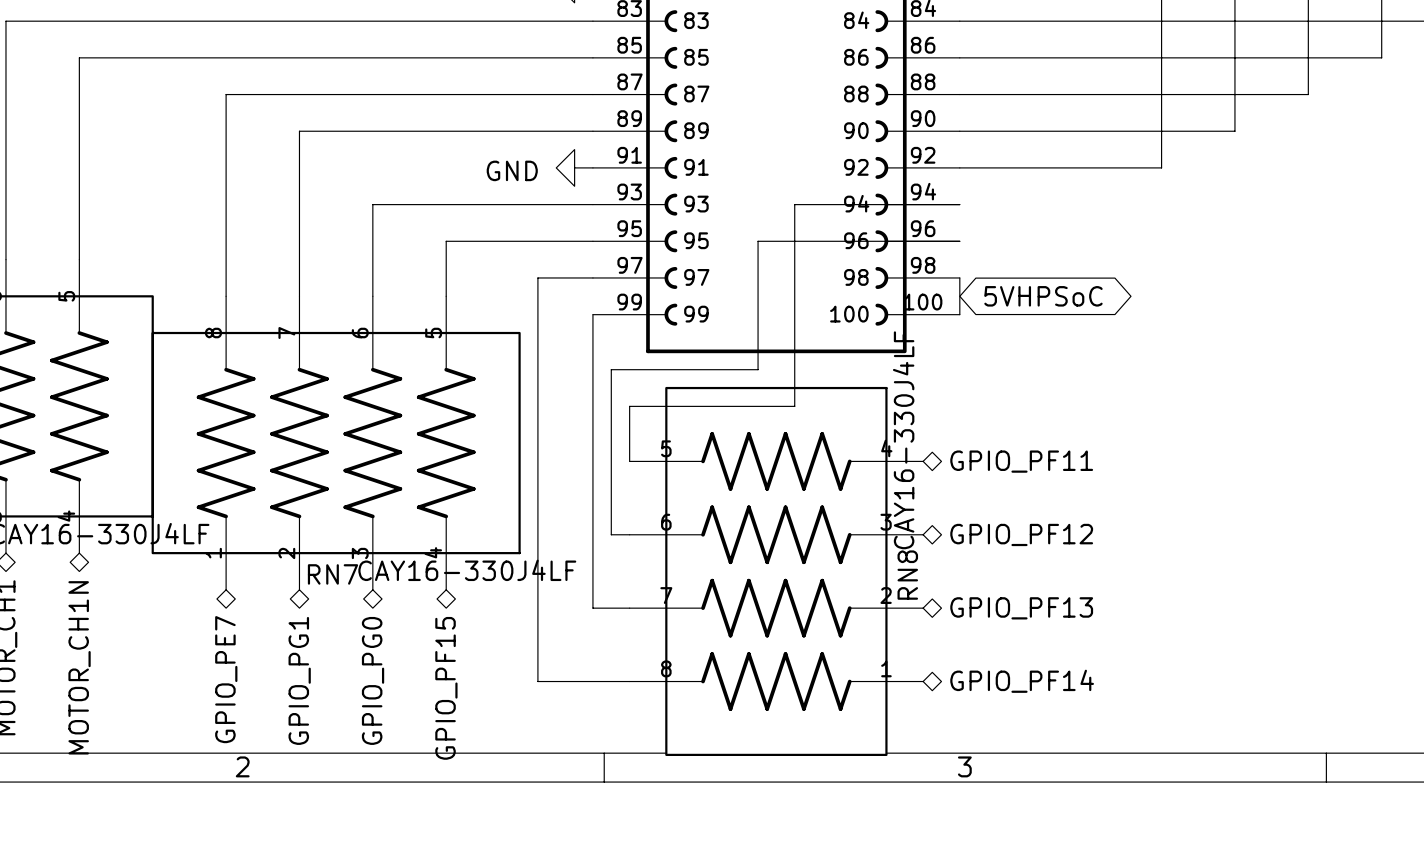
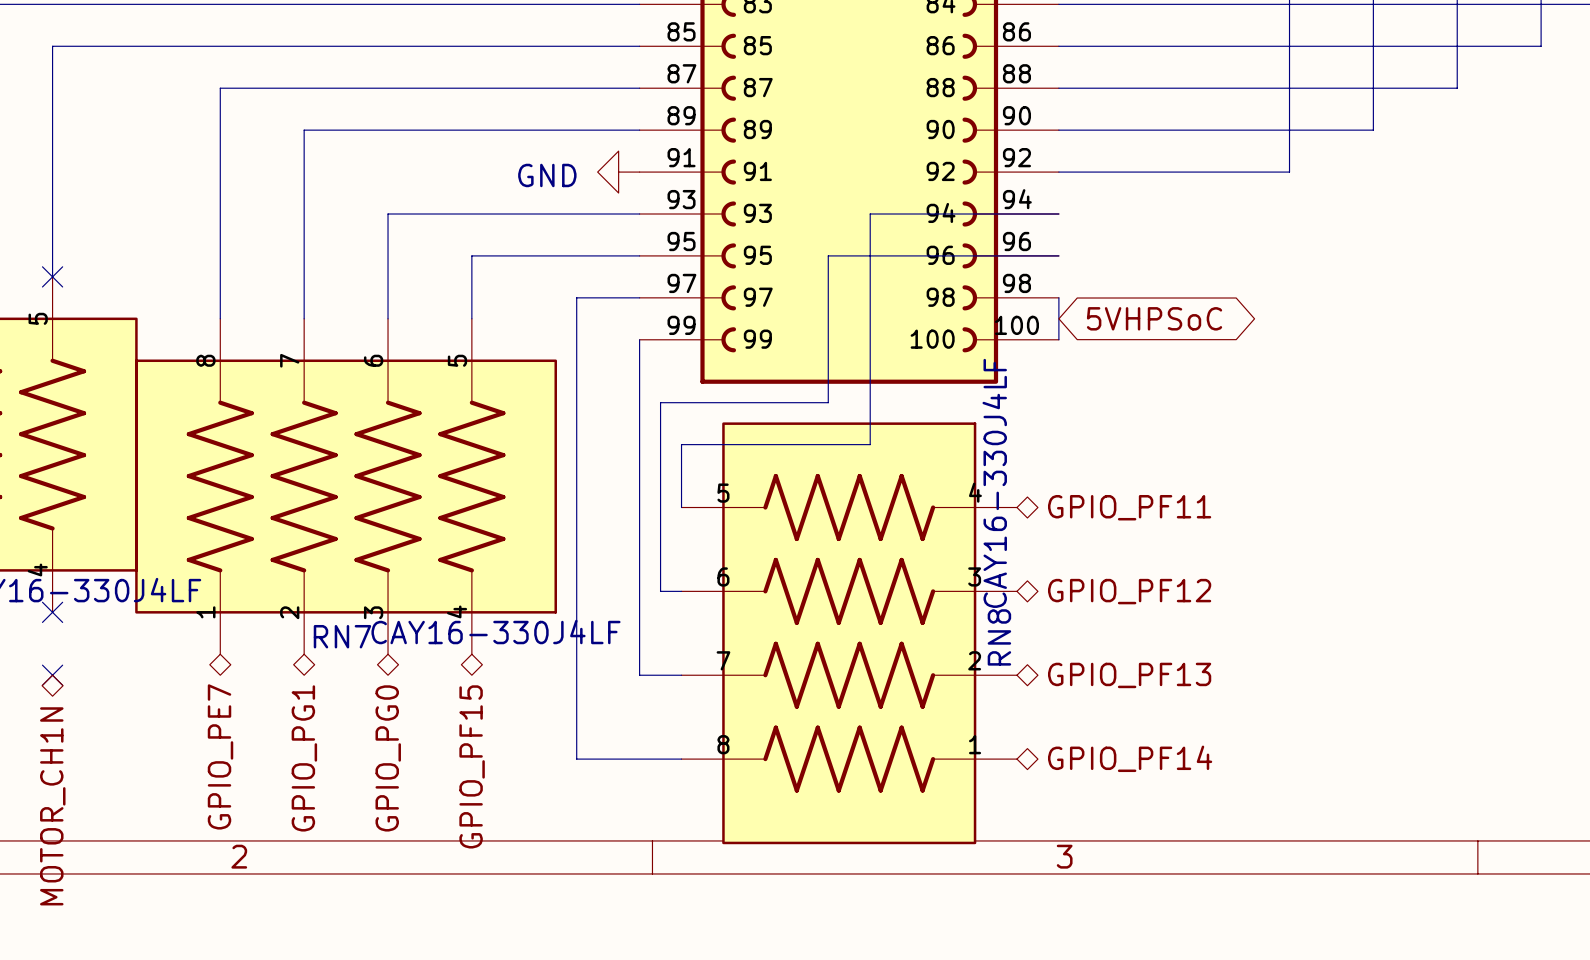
no-connect mark: none -> (52, 276)
no-connect mark: none -> (52, 612)
no-connect mark: none -> (52, 675)
hierarchical label position: MOTOR_CH1N (79, 667) -> MOTOR_CH1N (52, 806)

